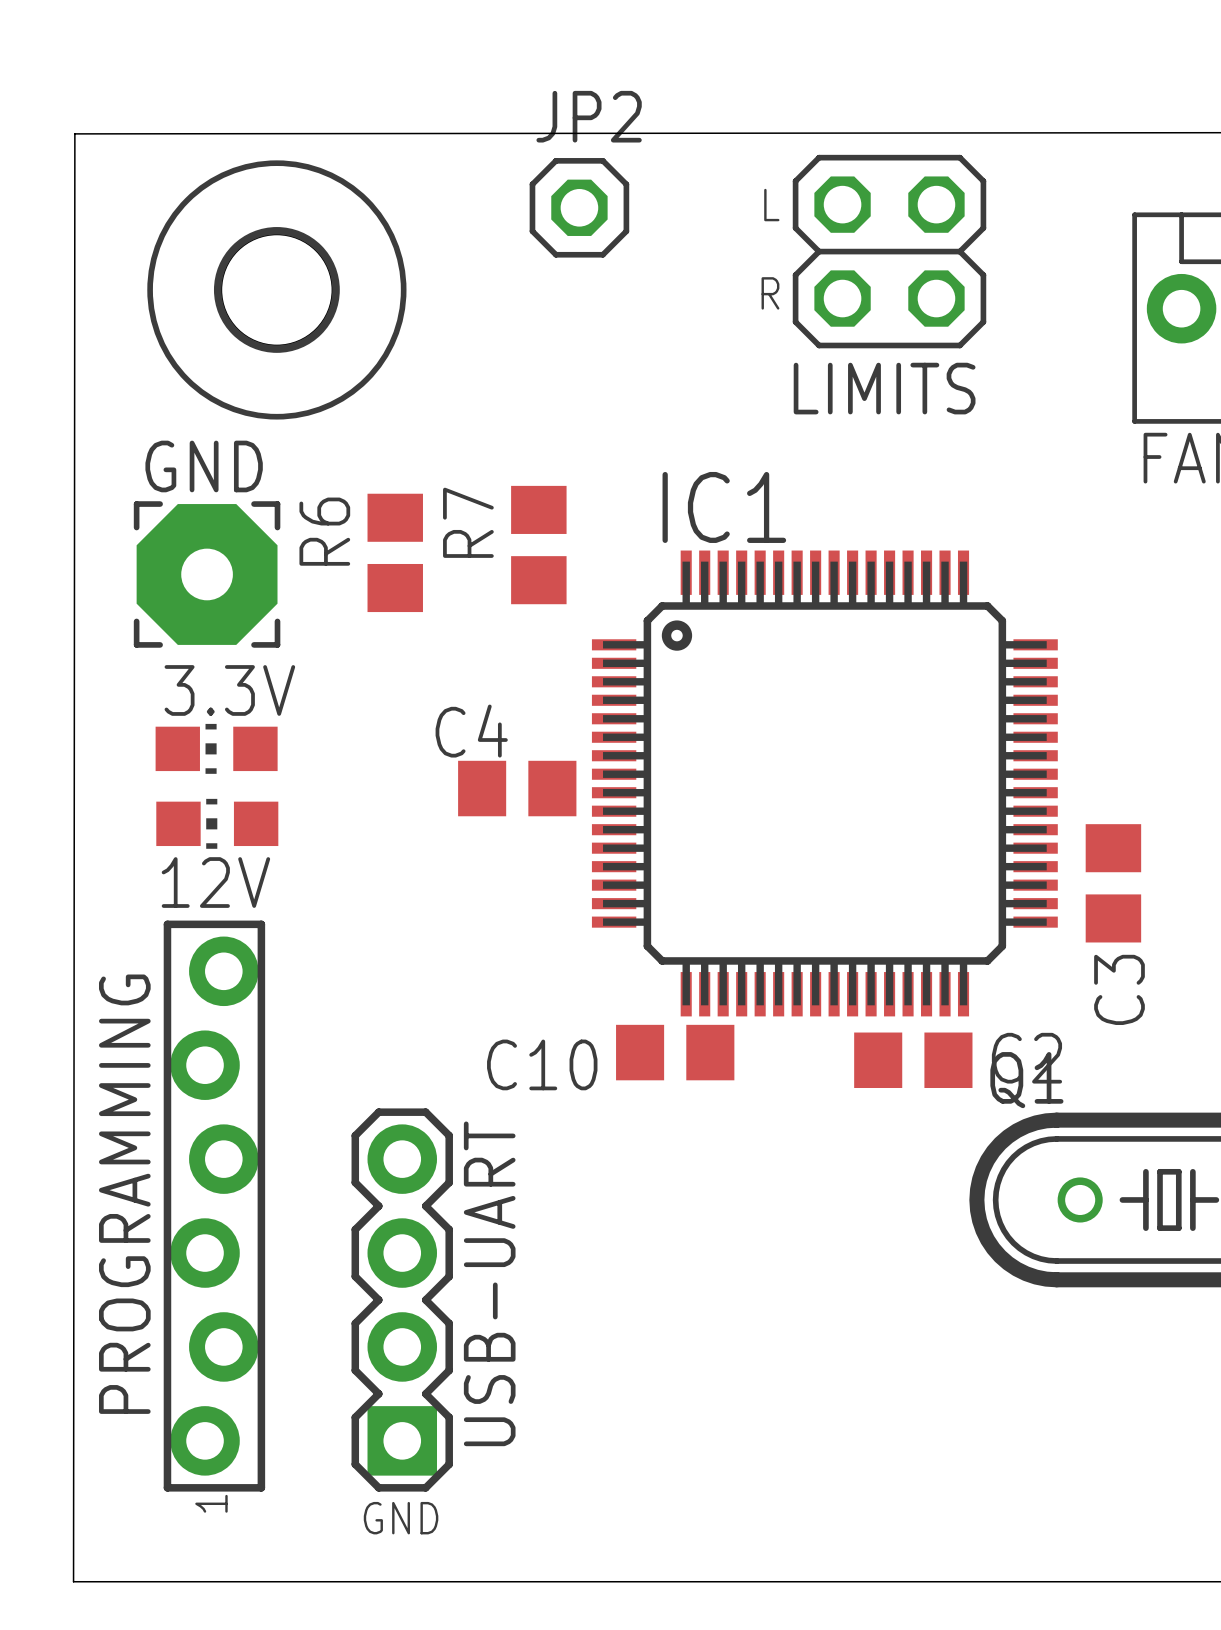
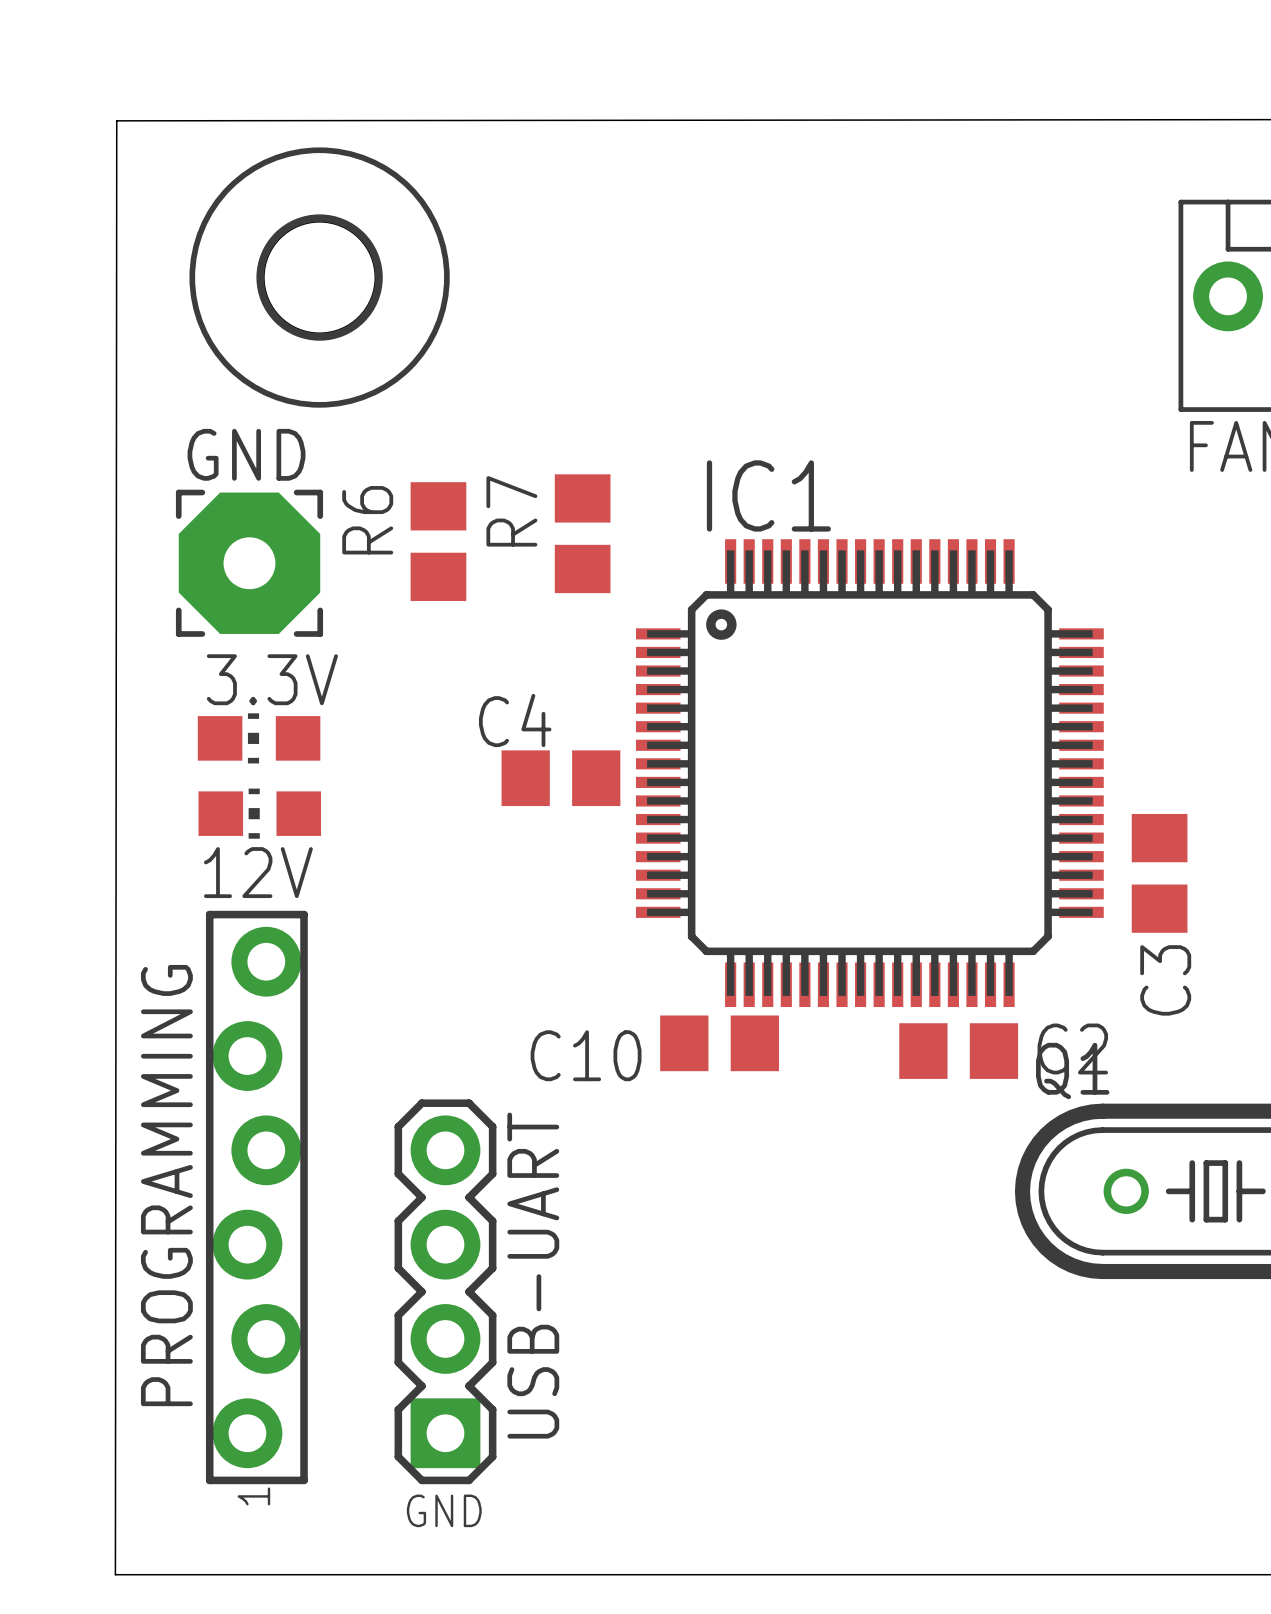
text: L (771, 205) -> none
JP2: (579, 207) -> none
LIMITS: (889, 251) -> none
text: R (770, 293) -> none

